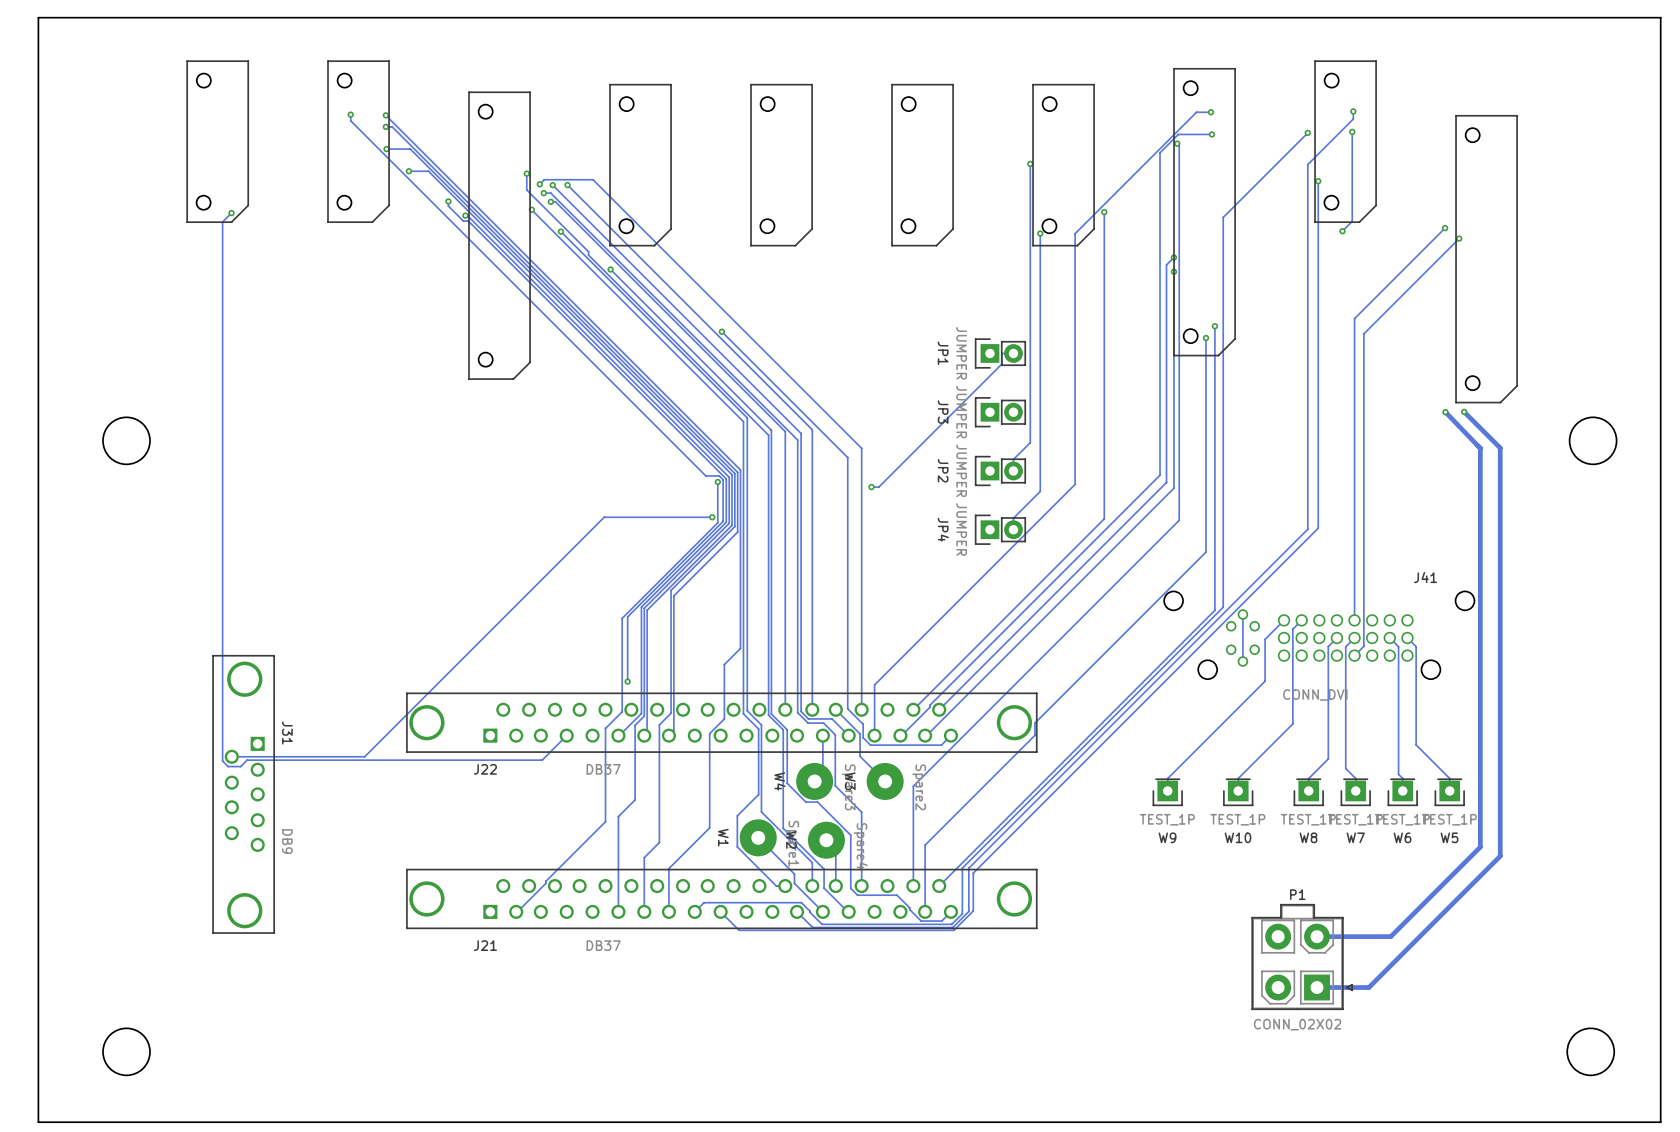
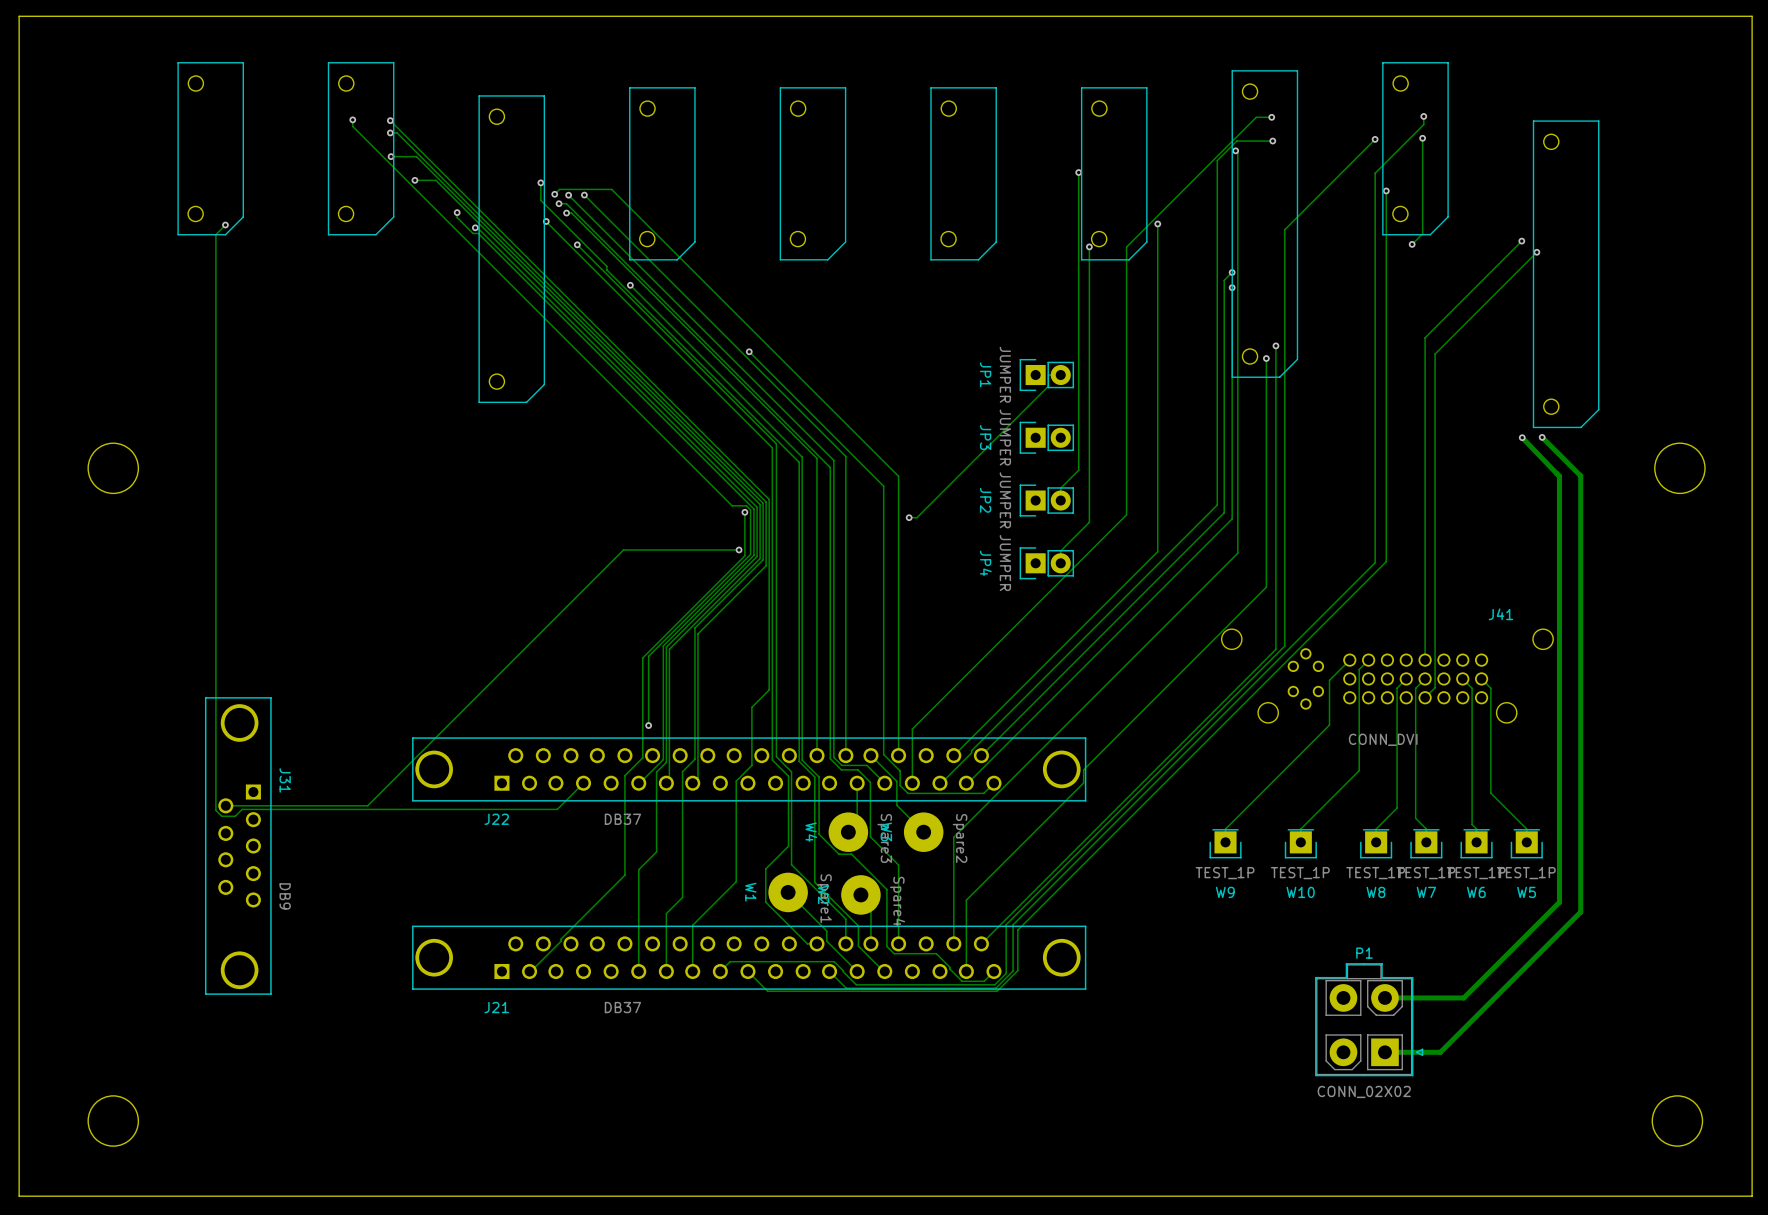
track: (1242, 614) (1242, 661) -> none

